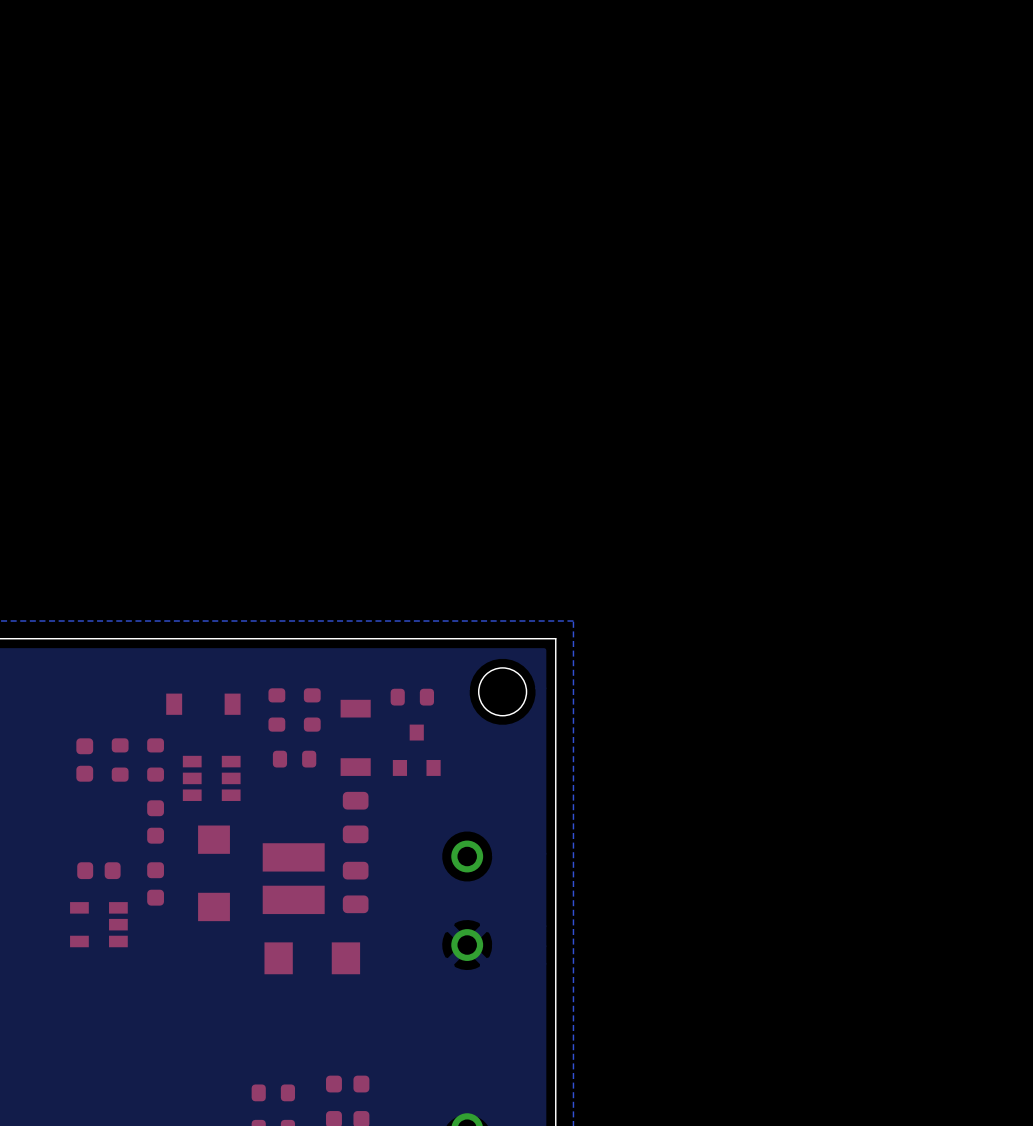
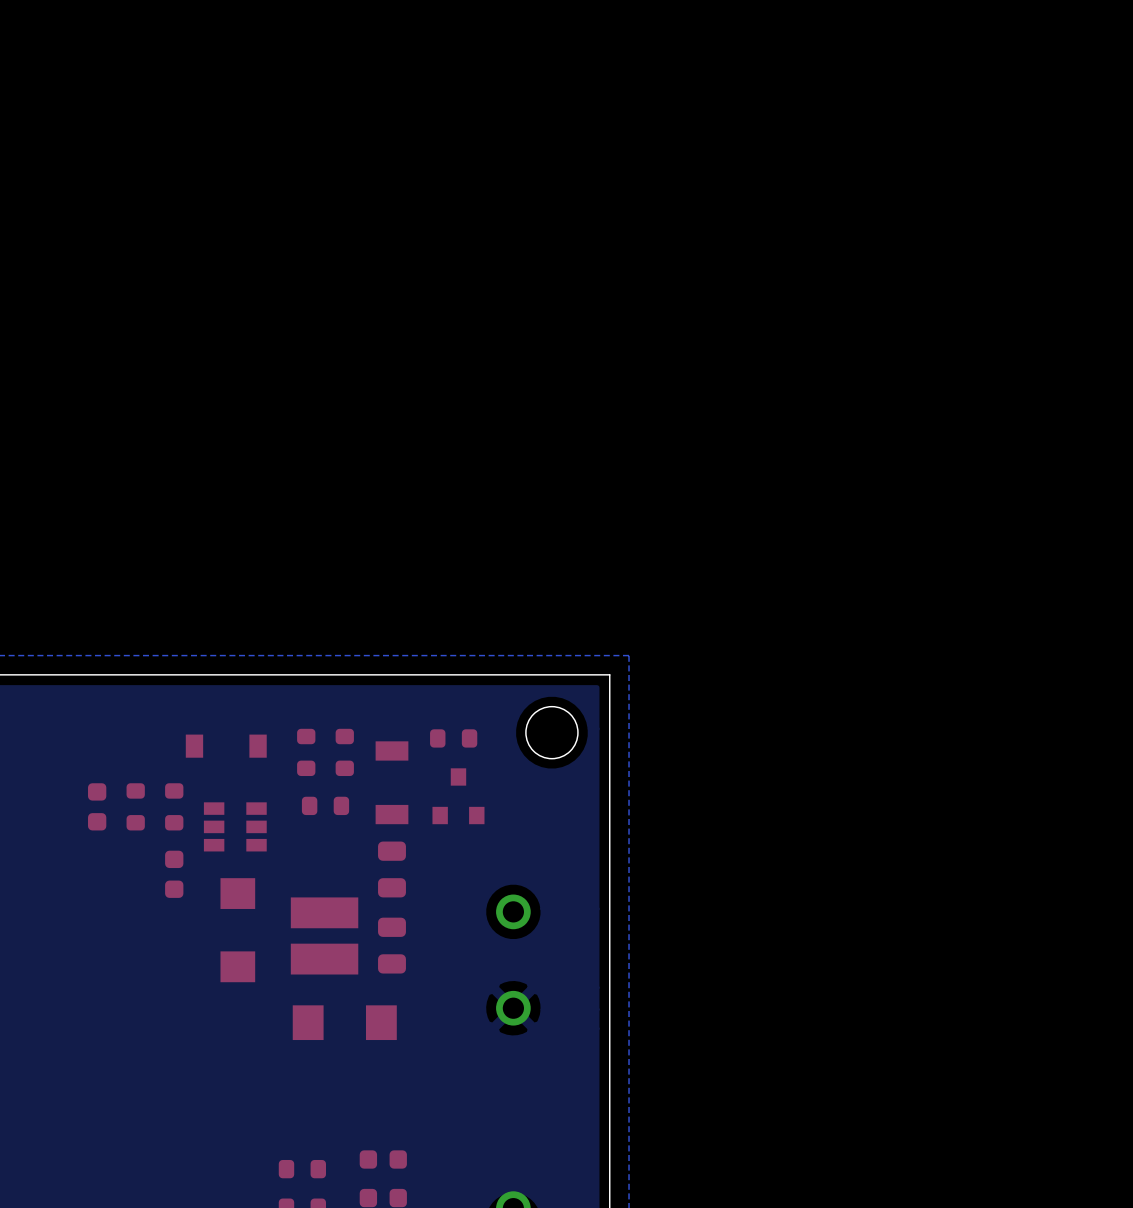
part: (98, 870) -> none
part: (155, 883) -> none
part: (98, 924) -> none

